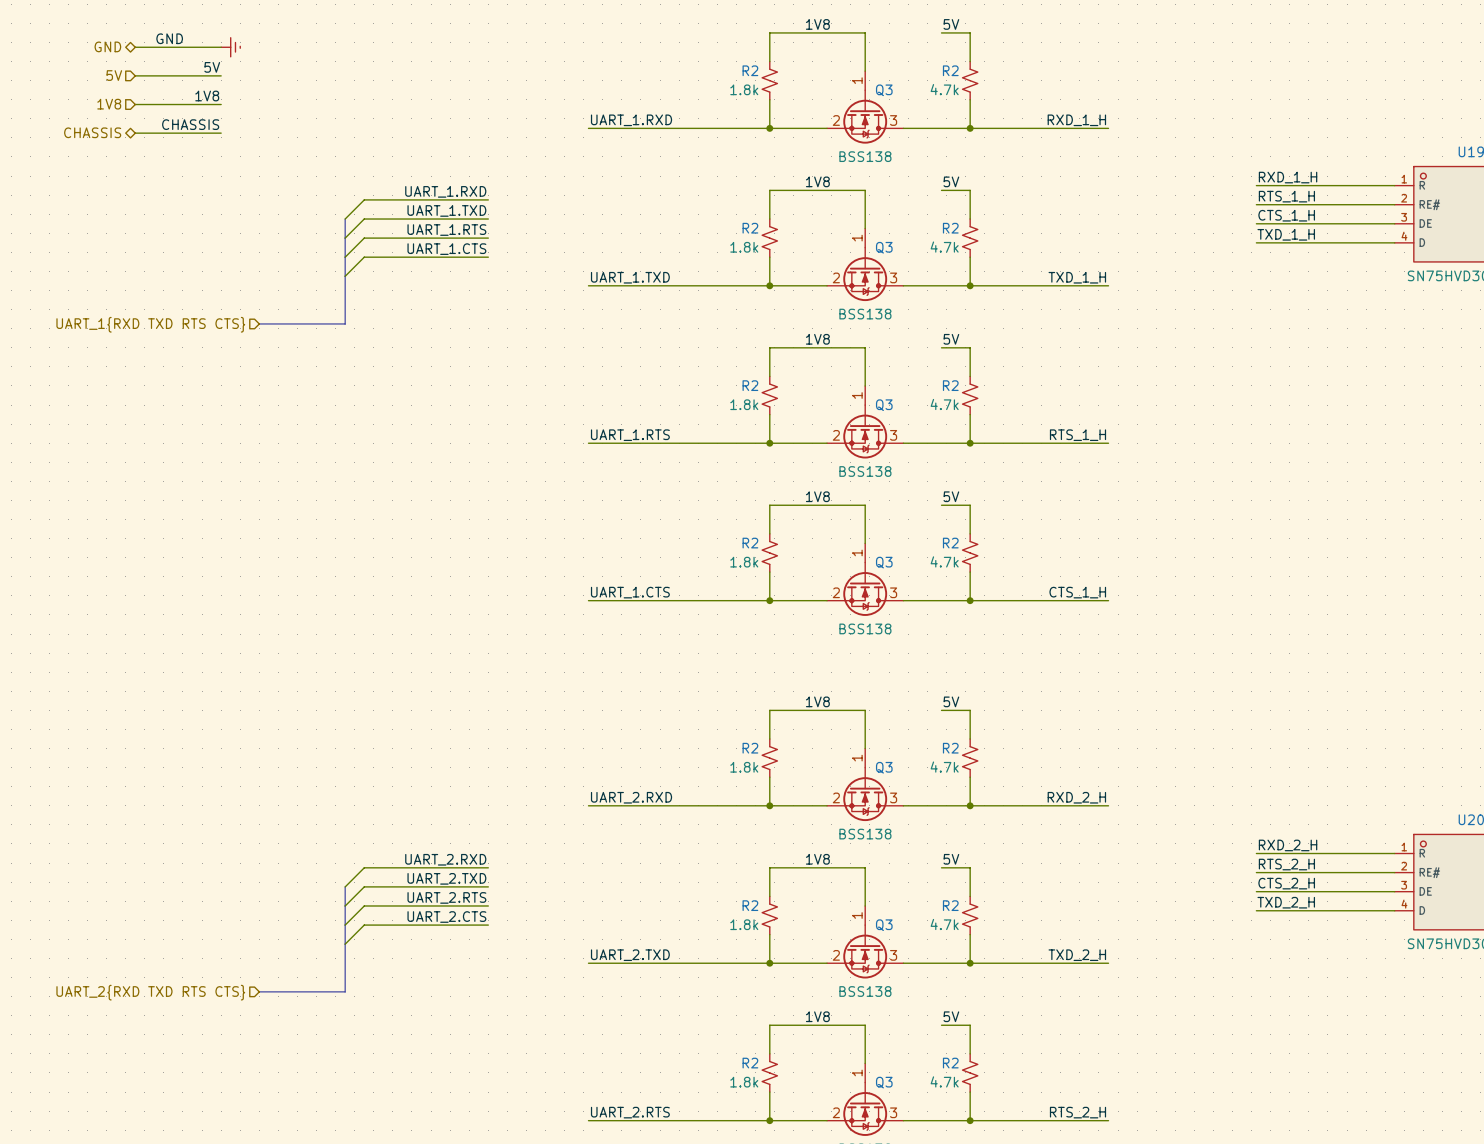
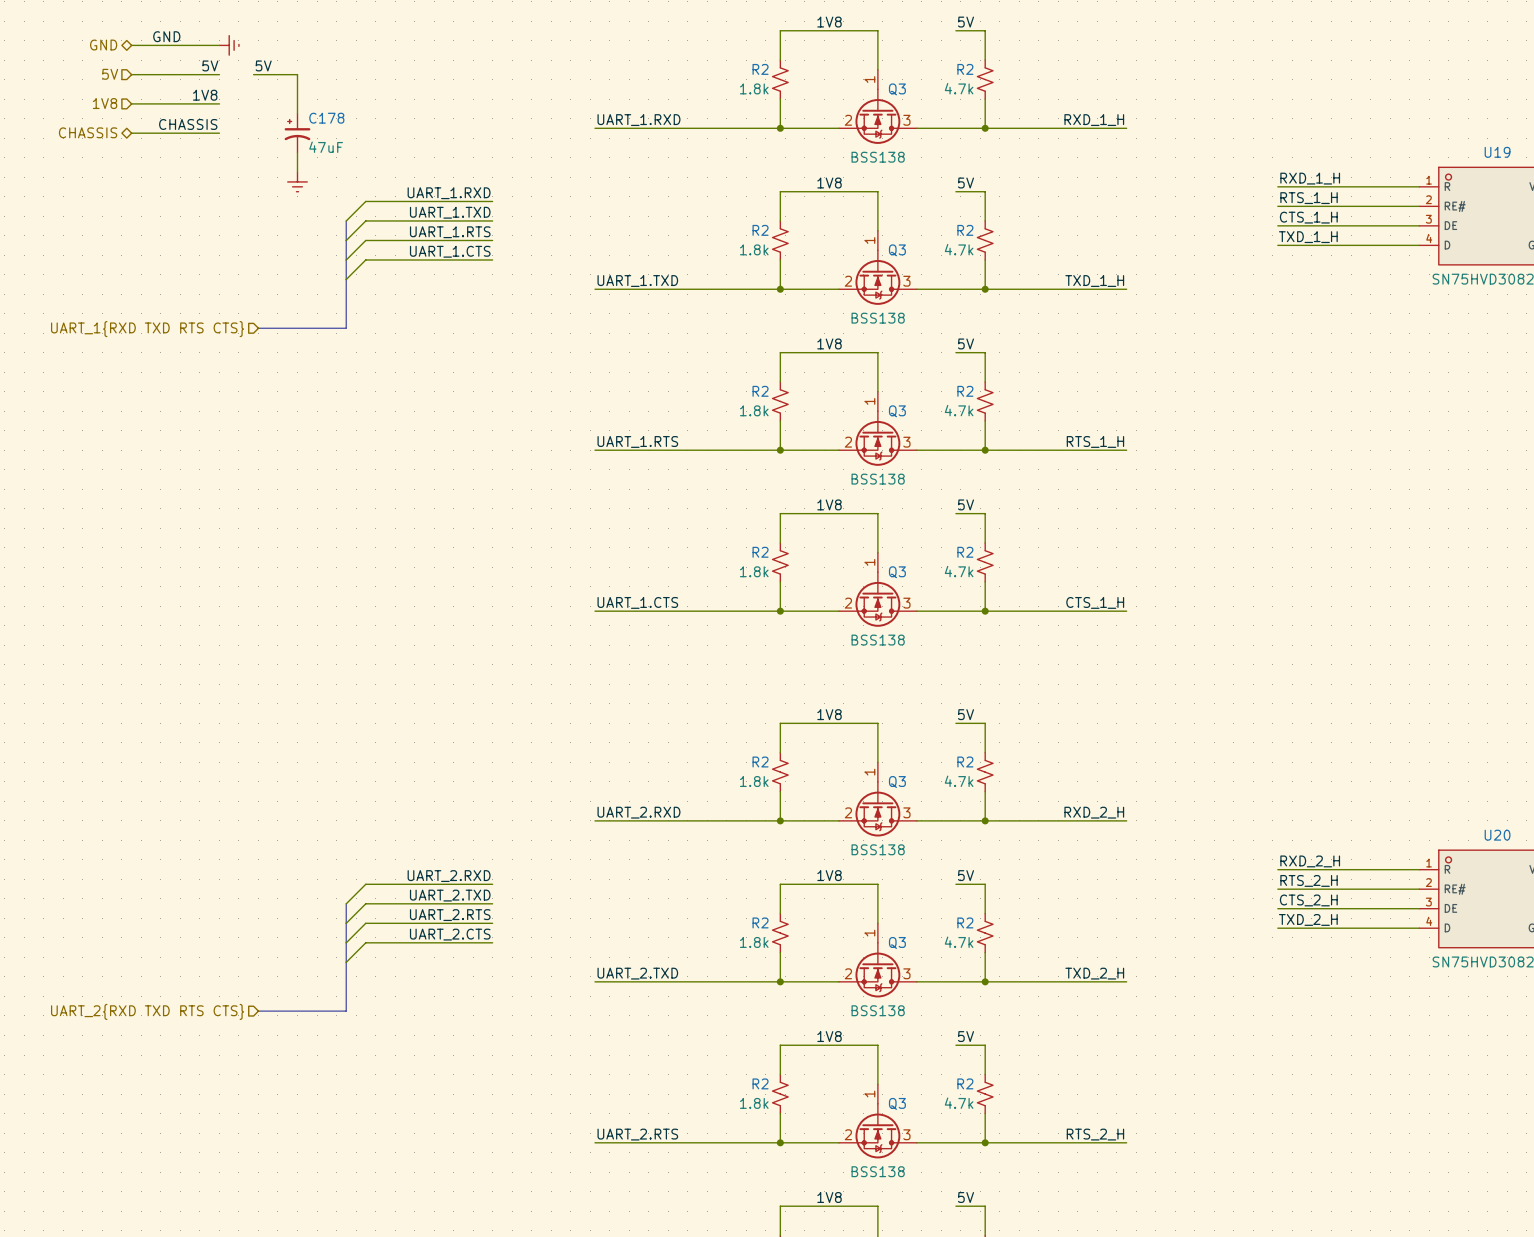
label: none -> 5V (263, 65)
wire: none -> (253, 74) (297, 74) (297, 113)
C178: none -> 47uF (297, 133)
wire: none -> (297, 152) (297, 172)
power symbol: none -> (297, 181)

